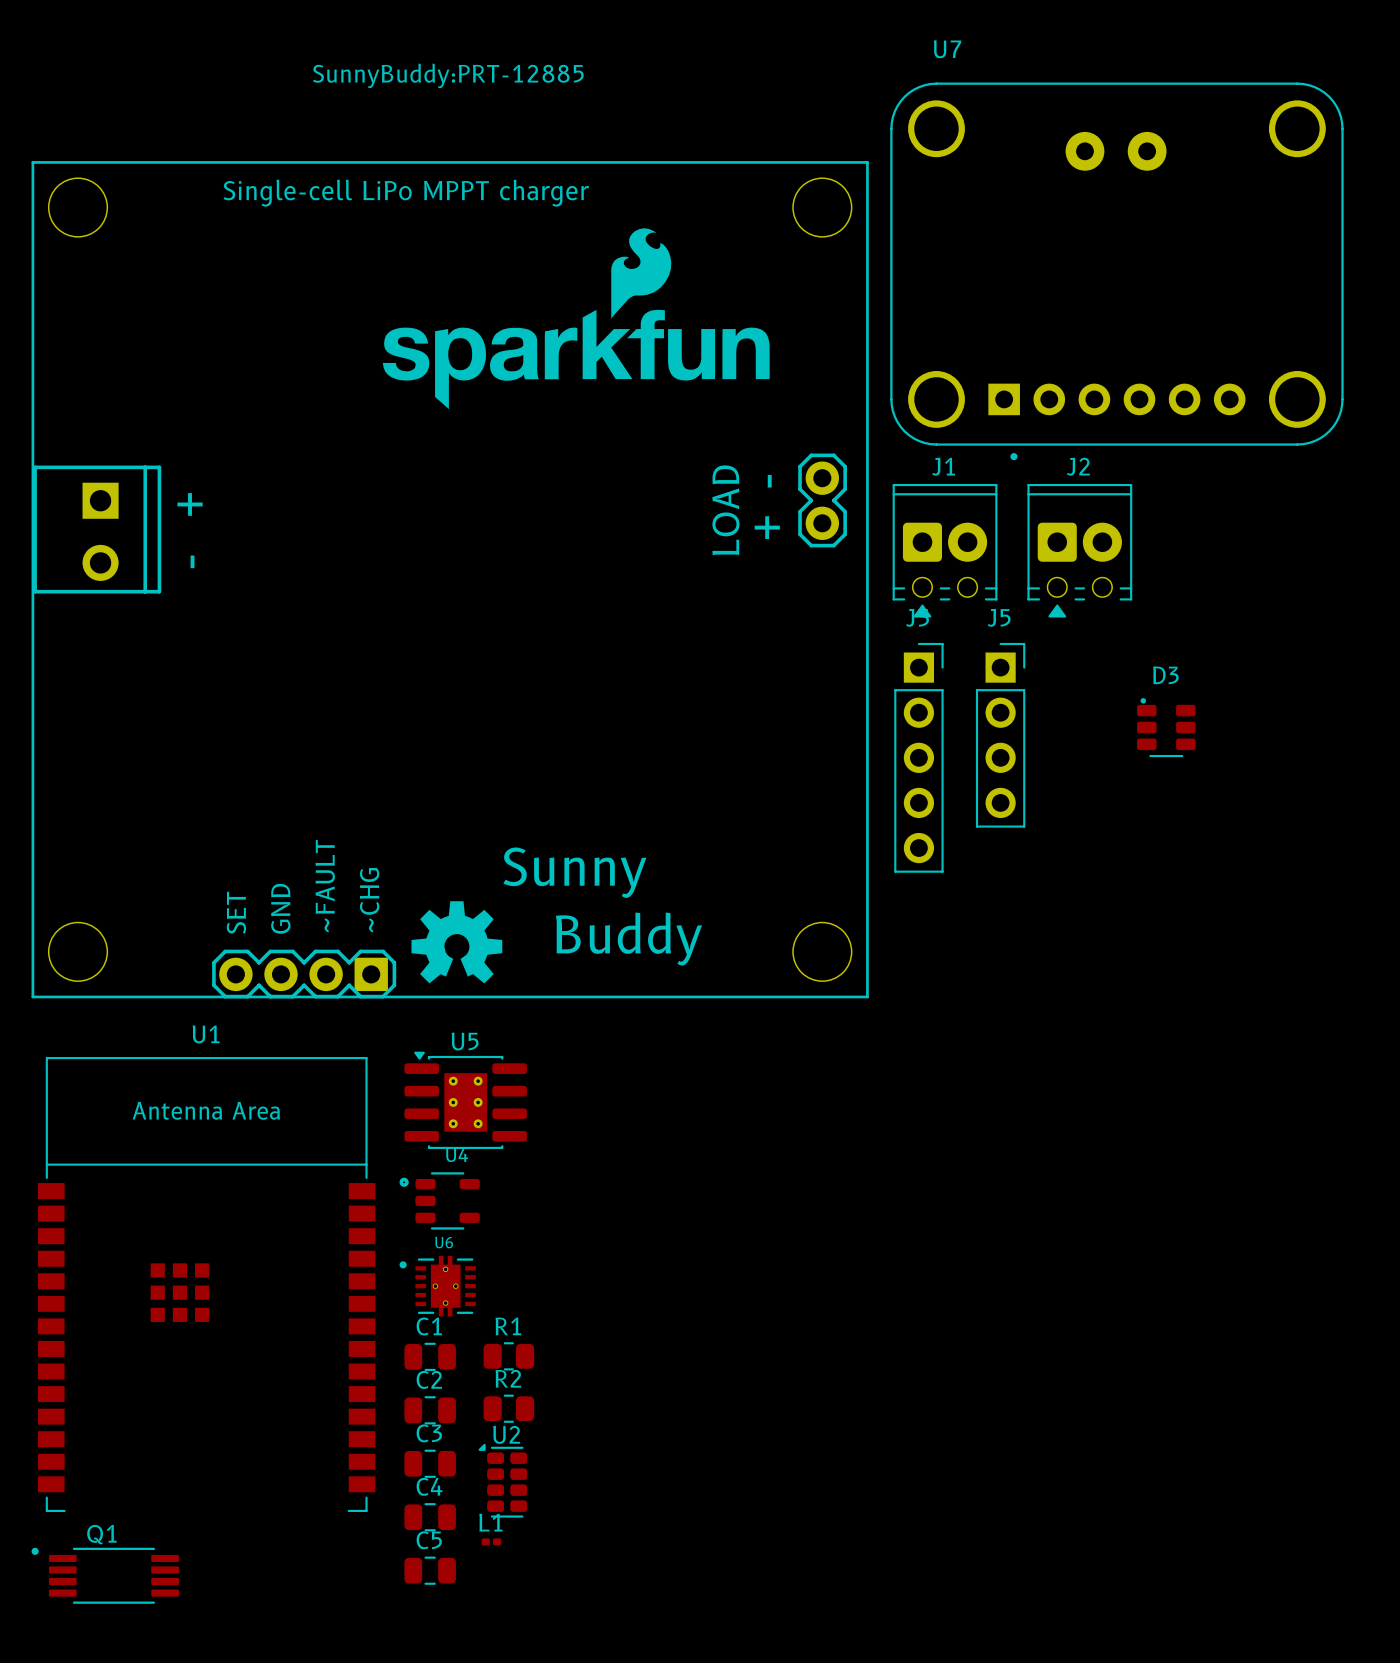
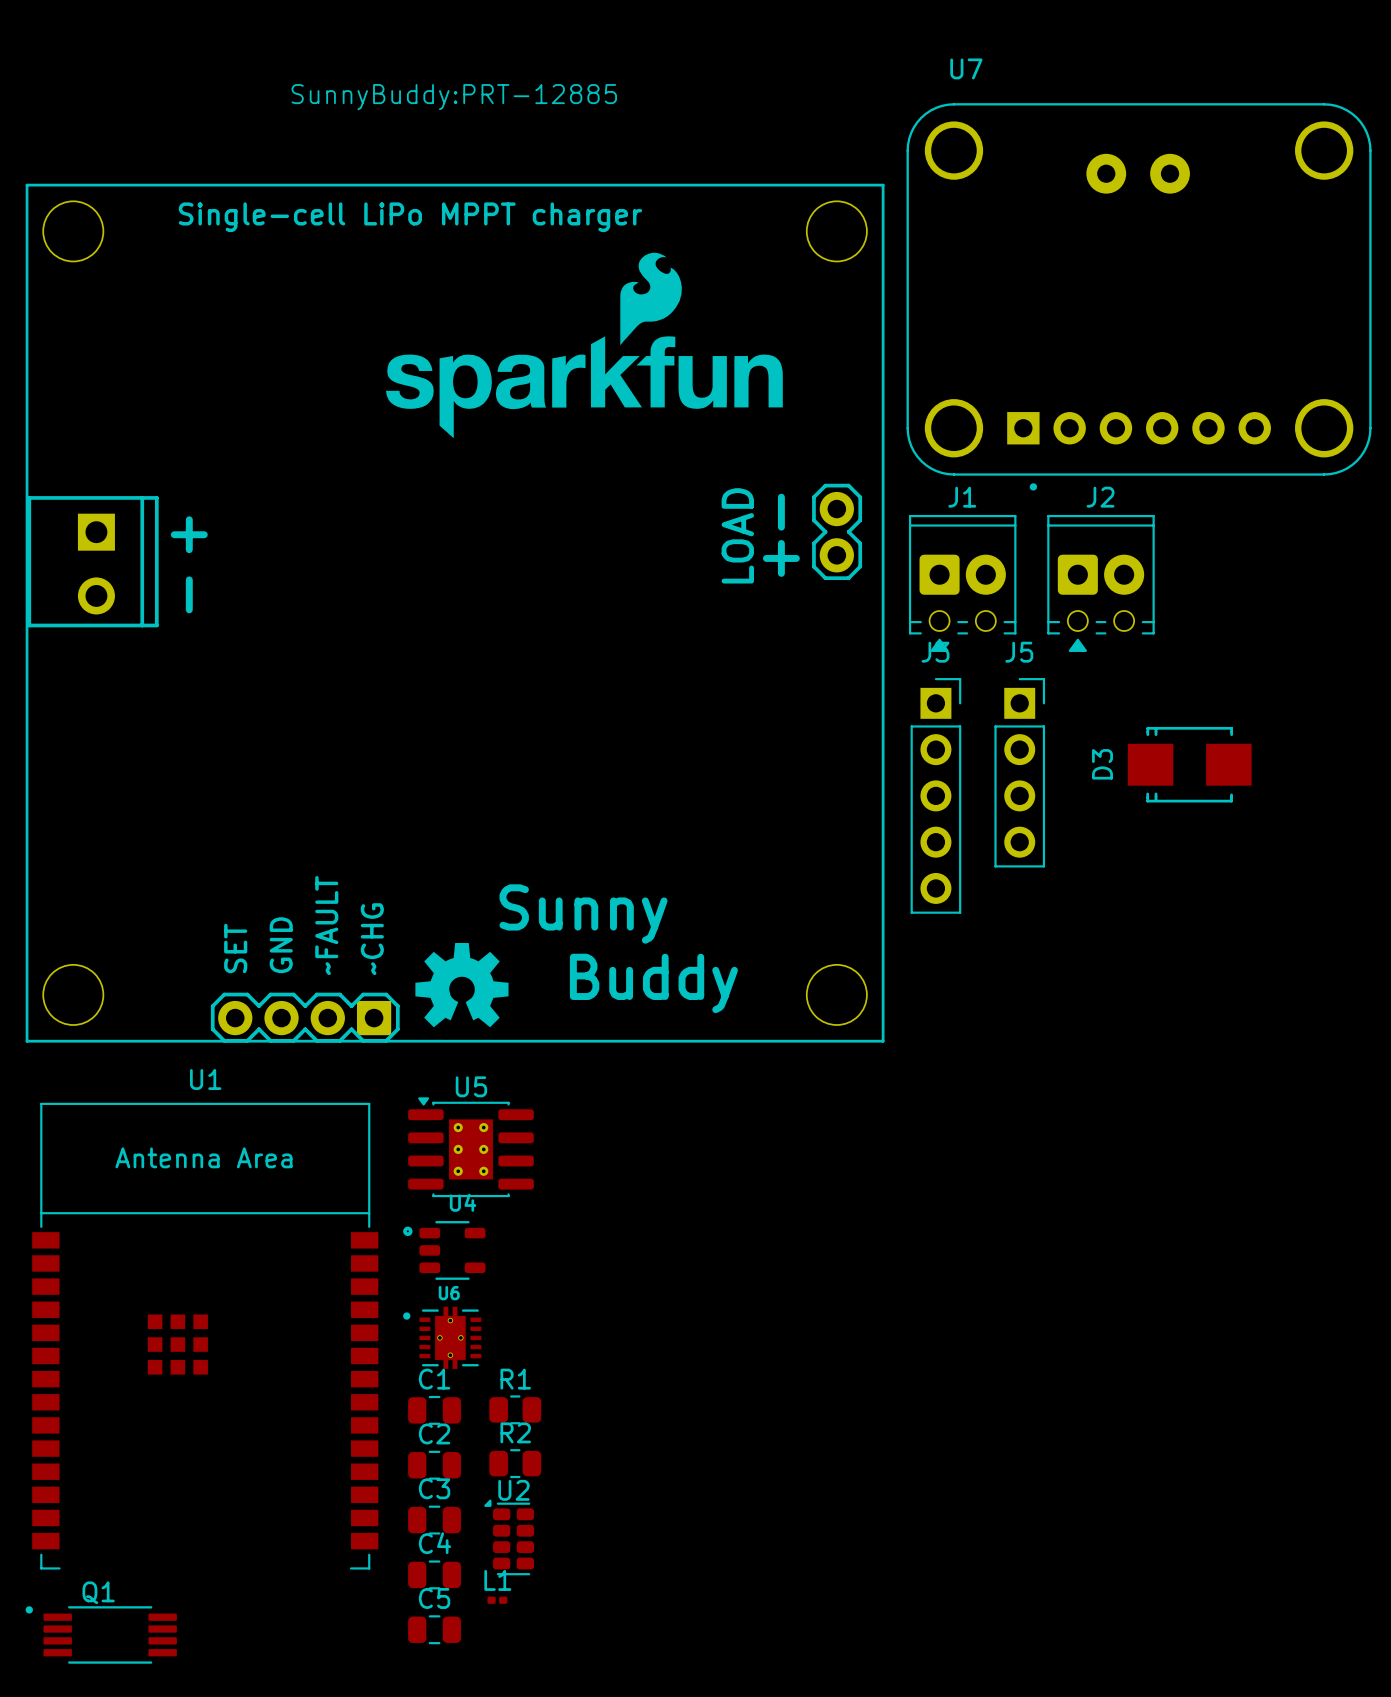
D3 name position: D3 (1165, 675) -> D3 (1102, 764)
D3 footprint: [1137, 698, 1196, 758] -> [1127, 726, 1252, 803]

